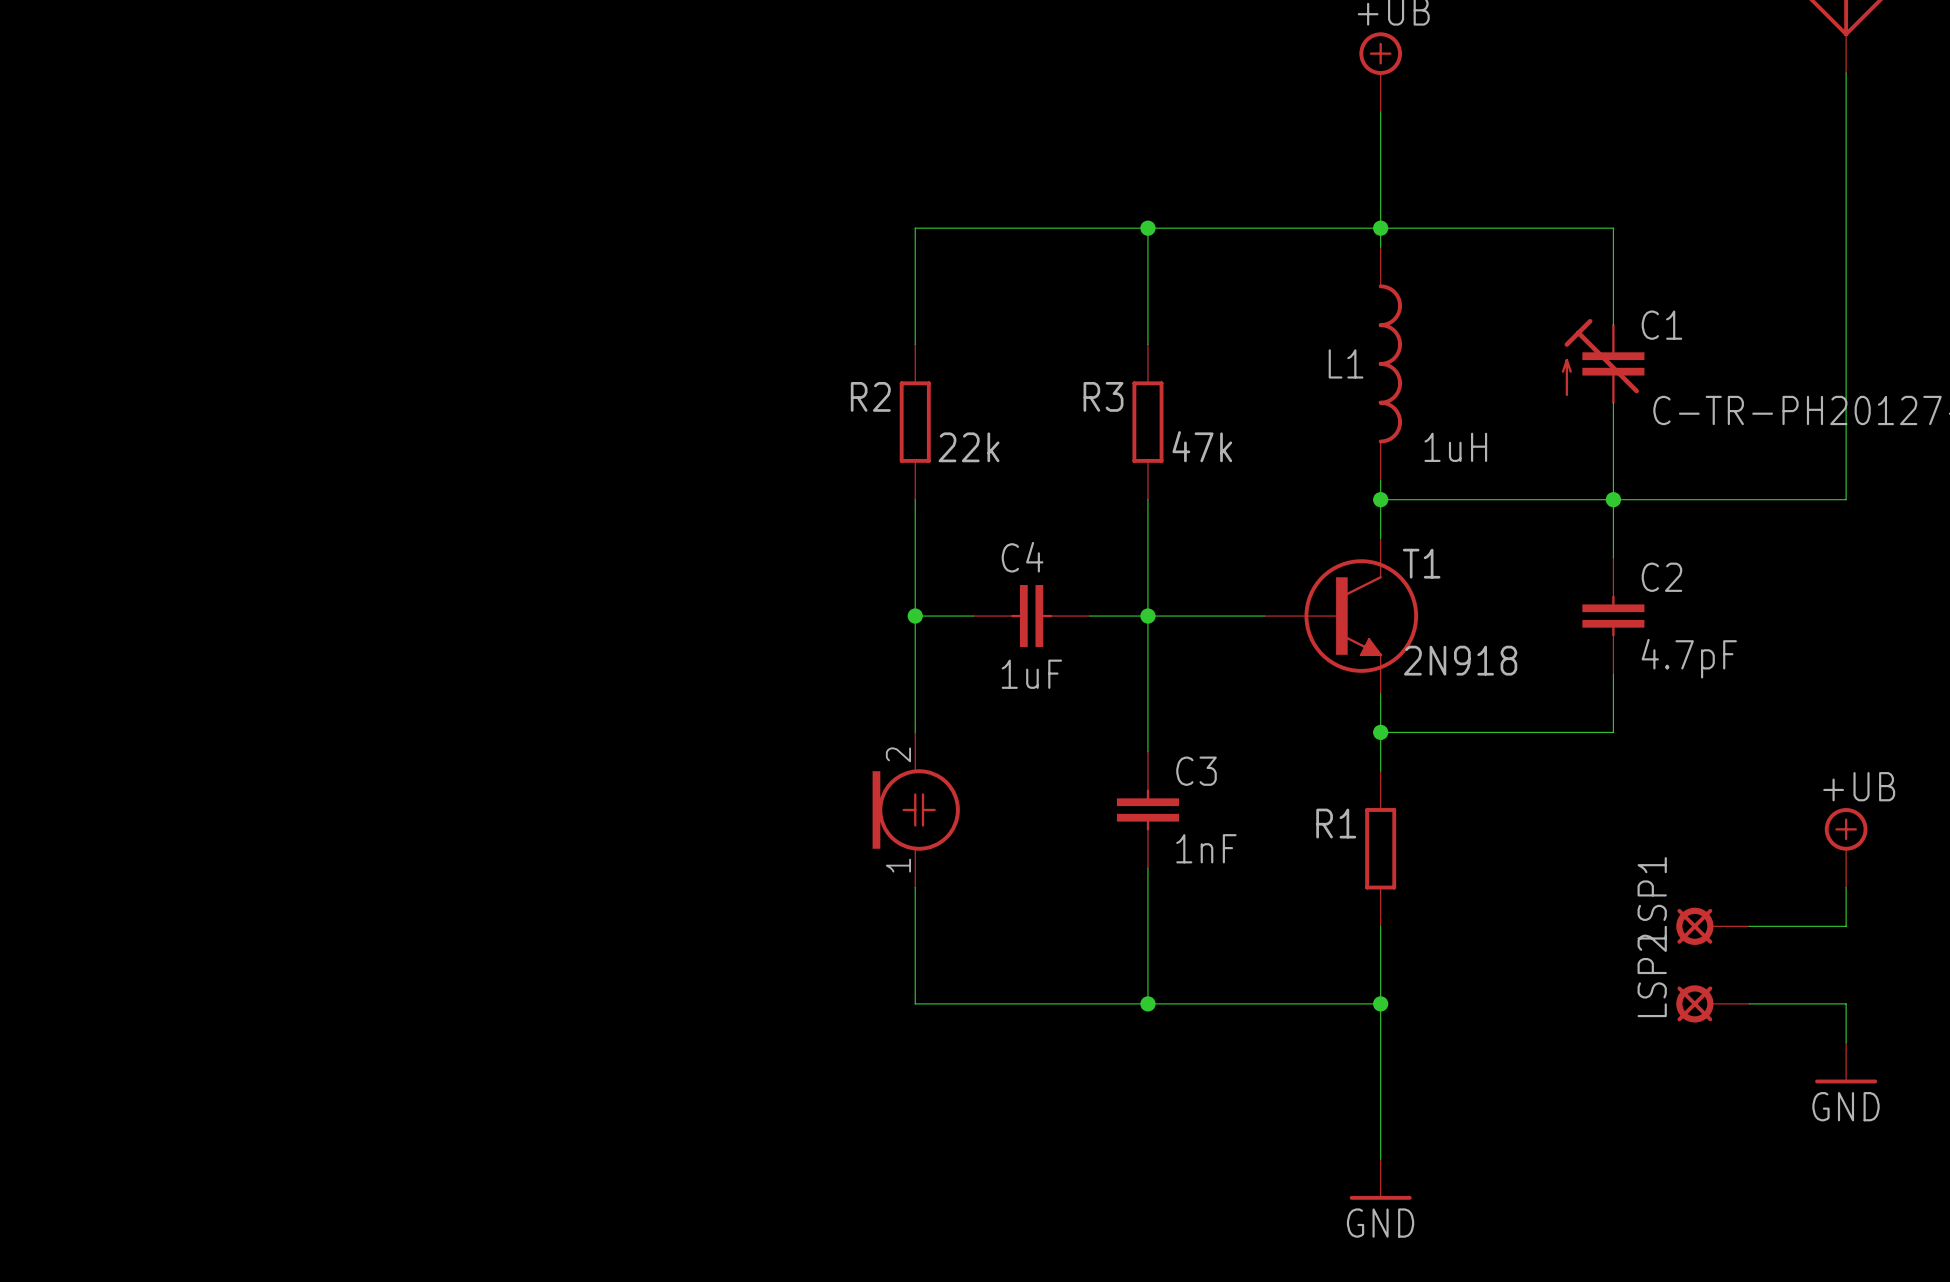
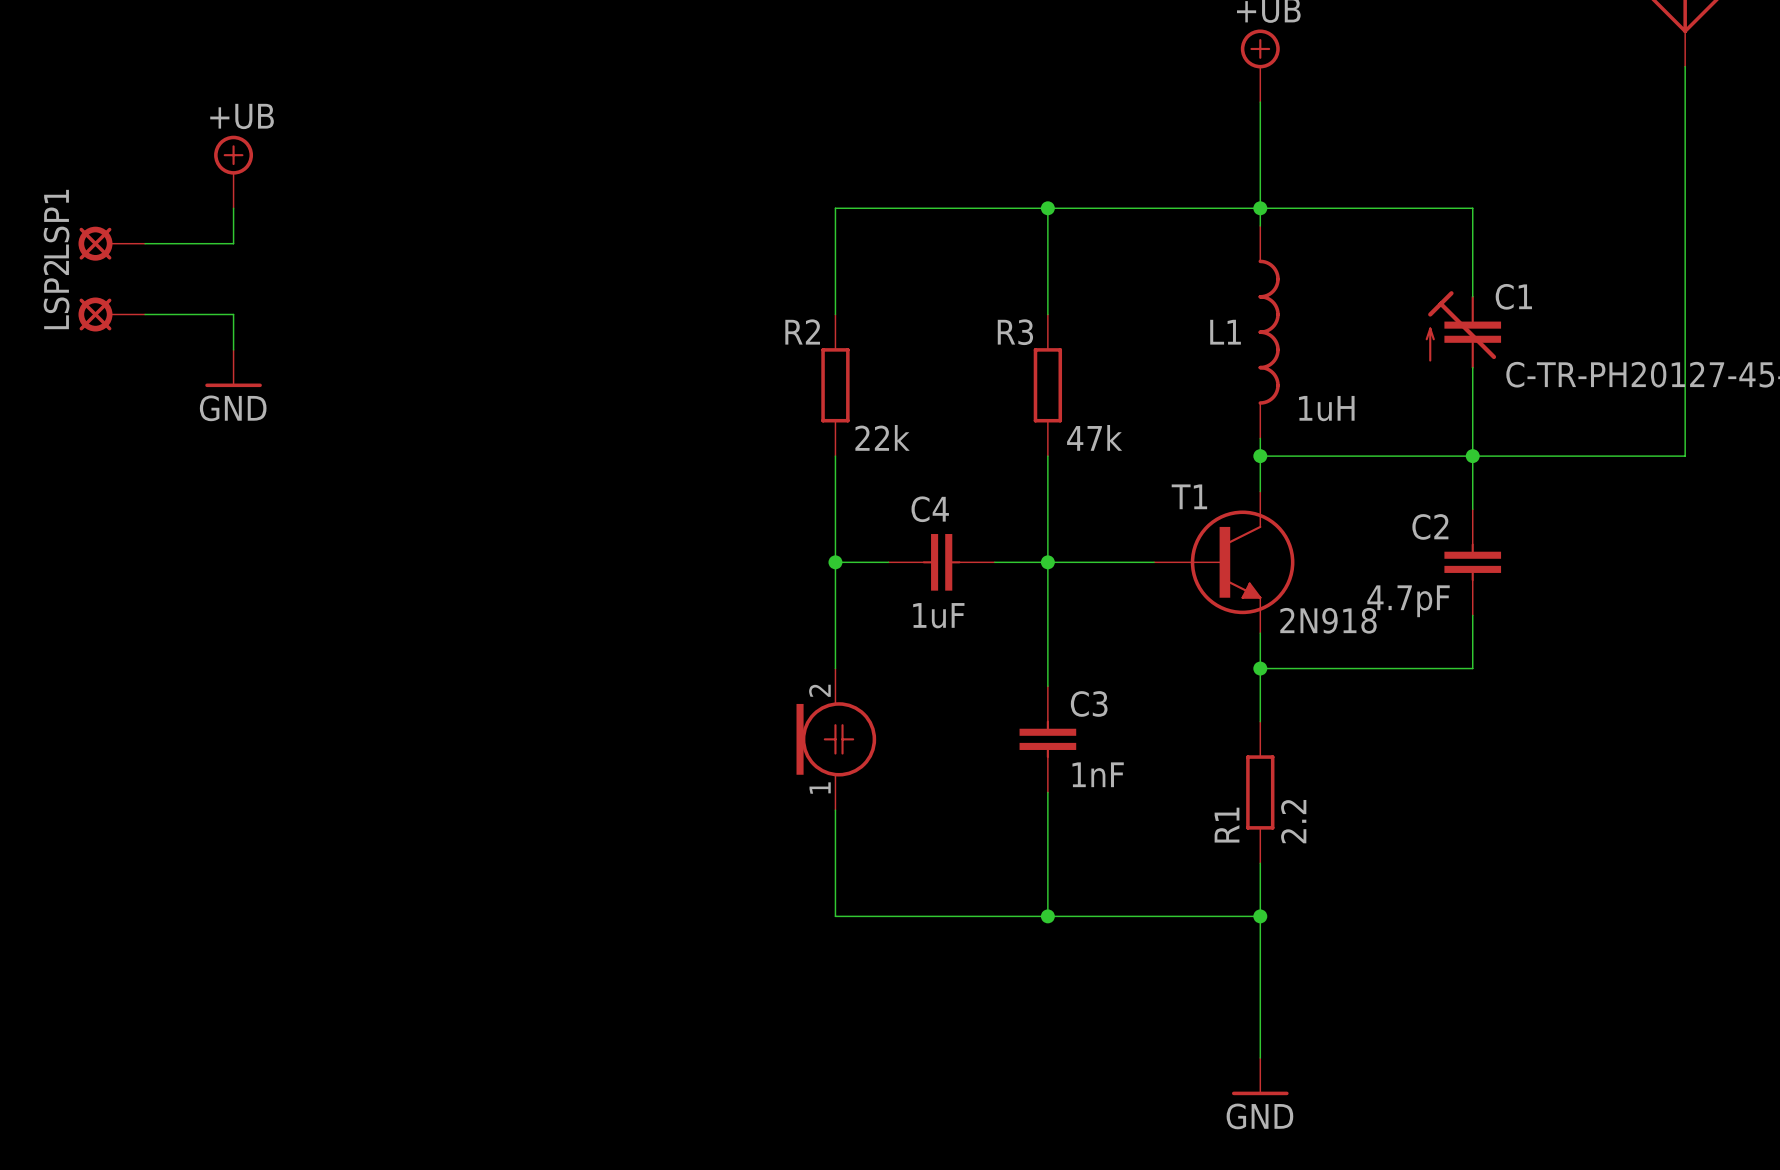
power symbol: none -> +UB (233, 171)
wire: none -> (233, 208) (233, 243) (145, 243)
wire: none -> (145, 314) (233, 314) (233, 349)
R2 name position: R2 (870, 396) -> R2 (802, 331)
R3 name position: R3 (1103, 396) -> R3 (1015, 332)
power symbol: none -> GND (233, 368)
R3 value position: 47k (1202, 446) -> 47k (1094, 437)
R2 value position: 22k (969, 447) -> 22k (882, 437)
T1 name position: T1 (1421, 563) -> T1 (1189, 496)
C2 name position: C2 (1661, 577) -> C2 (1430, 526)
C2 value position: 4.7pF (1689, 658) -> 4.7pF (1408, 601)
T1 value position: 2N918 (1460, 660) -> 2N918 (1328, 620)
R1 name rotation: 0° (1336, 823) -> 90° counterclockwise (1227, 825)
power symbol: +UB (1846, 847) -> none
R1 position: (1380, 848) -> (1260, 792)
wire: (1846, 887) (1846, 926) (1749, 926) -> none
R1 value: none -> 2.2 (1293, 821)
LSP1 position: (1712, 926) -> (111, 243)
LSP2 position: (1712, 1003) -> (111, 314)
wire: (1749, 1003) (1846, 1003) (1846, 1042) -> none
power symbol: GND (1846, 1063) -> none

